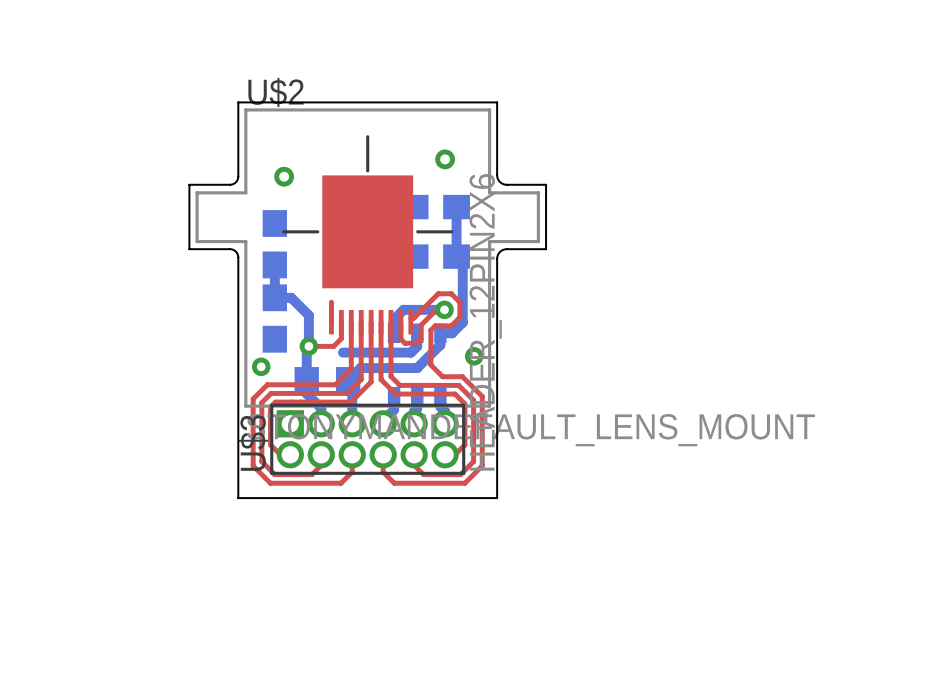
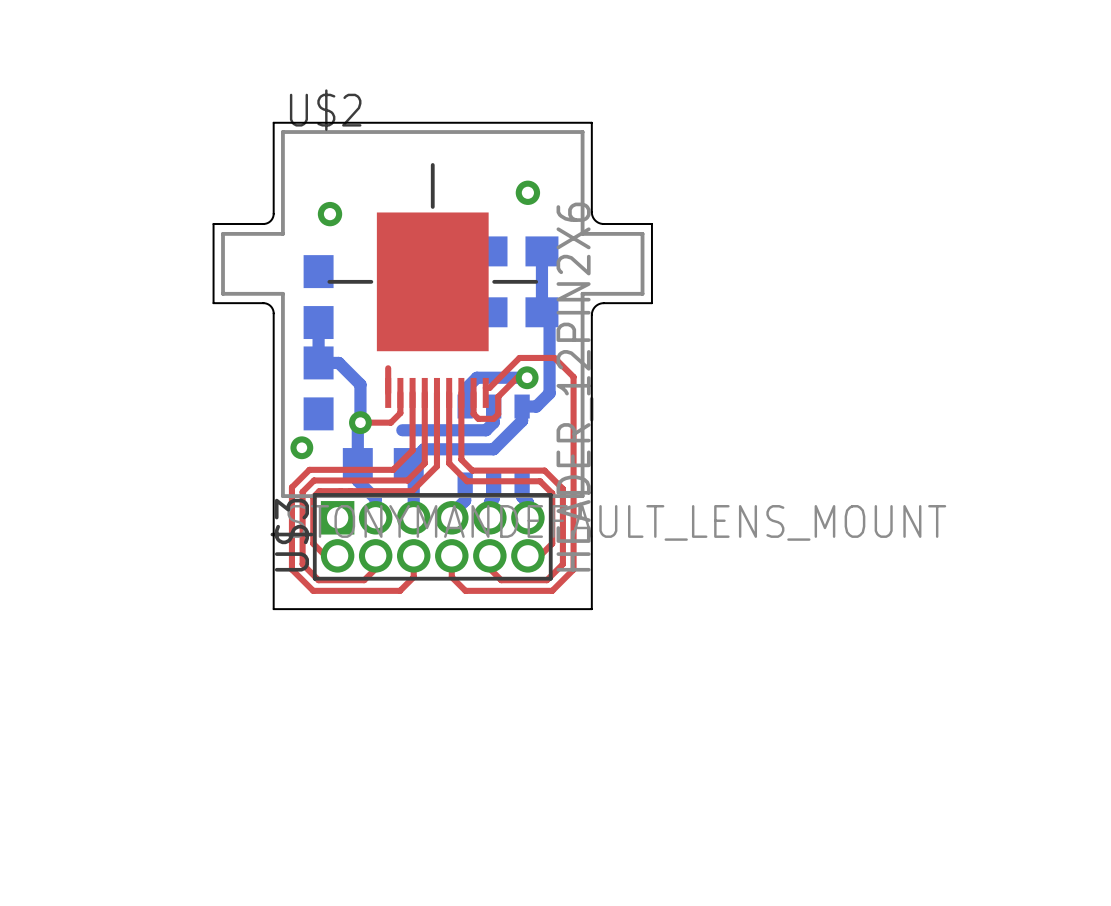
top track: (451, 293) (459, 302) (459, 317) (451, 325) (435, 325) (430, 330) (430, 364) (442, 376) (462, 376) (482, 396) -> (535, 357) (554, 357) (573, 376) (573, 484)
via: (474, 356) -> none

